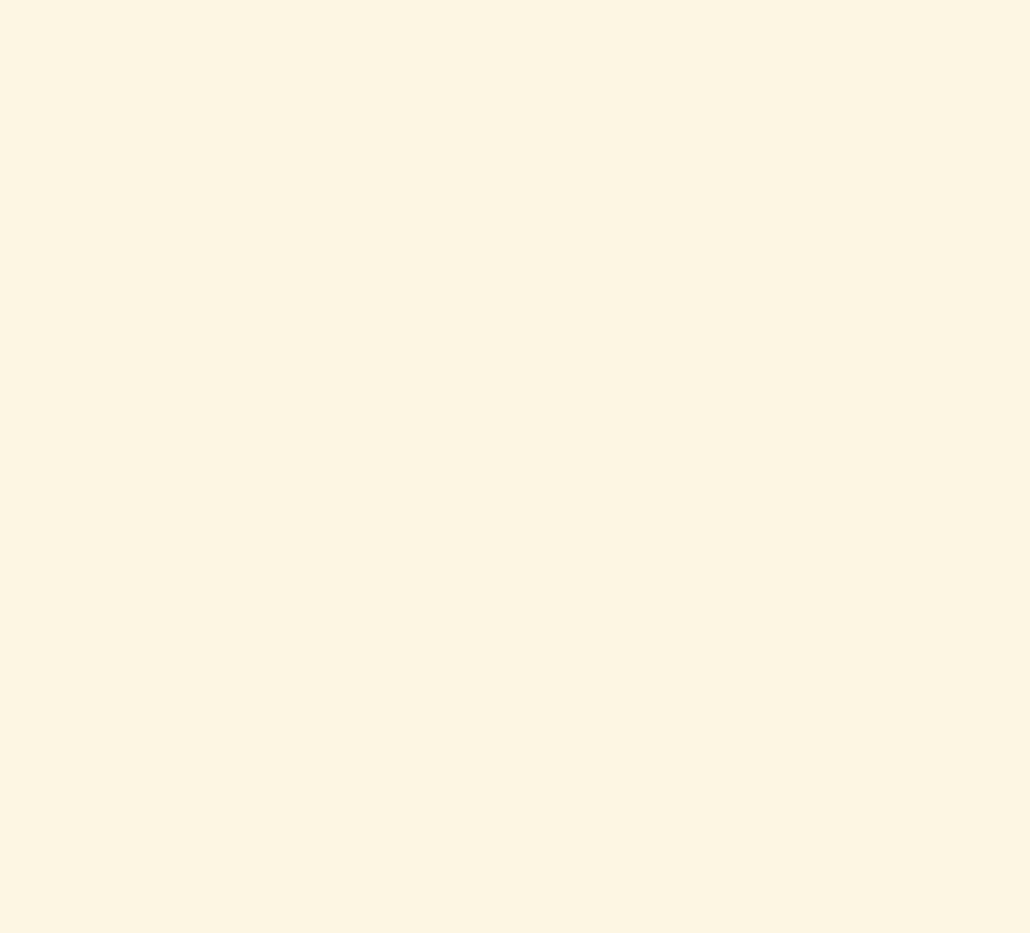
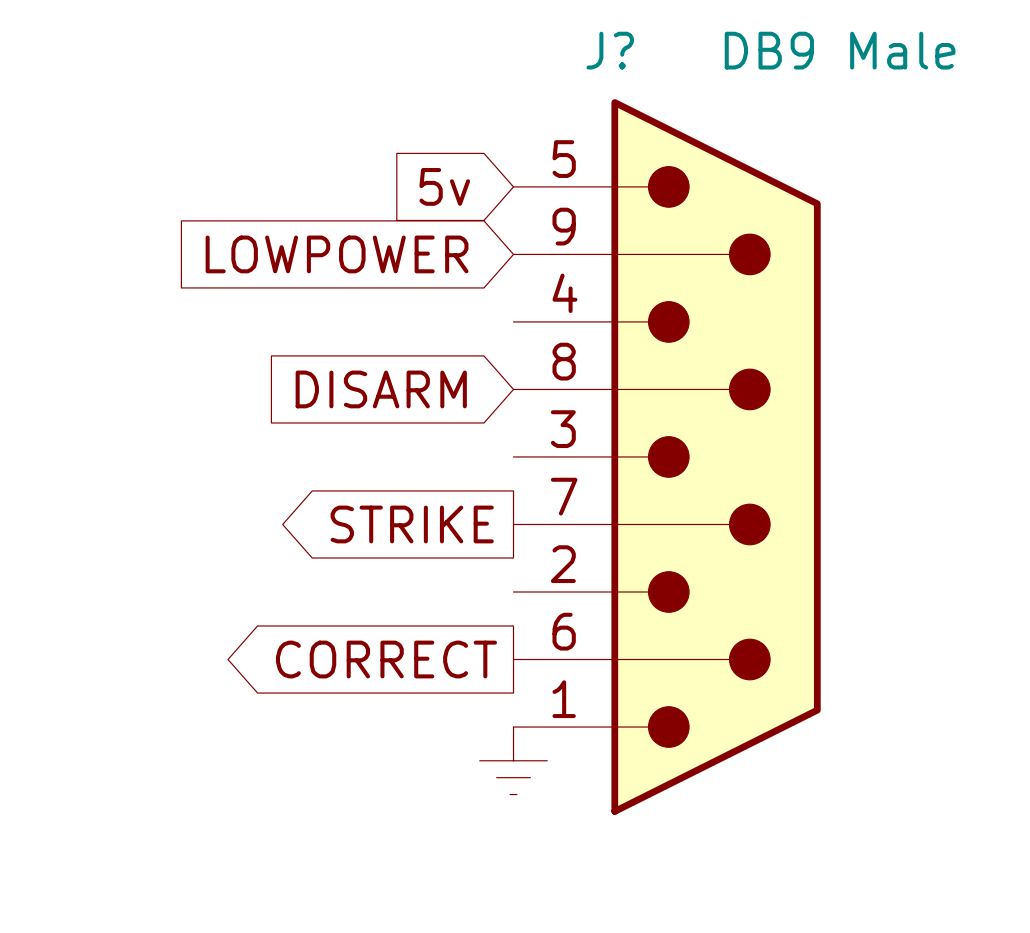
global label: none -> 5v (444, 186)
global label: none -> LOWPOWER (337, 254)
global label: none -> DISARM (381, 389)
J?: none -> DB9 Male (667, 456)
global label: none -> STRIKE (412, 524)
global label: none -> CORRECT (386, 659)
power symbol: none -> (513, 760)

